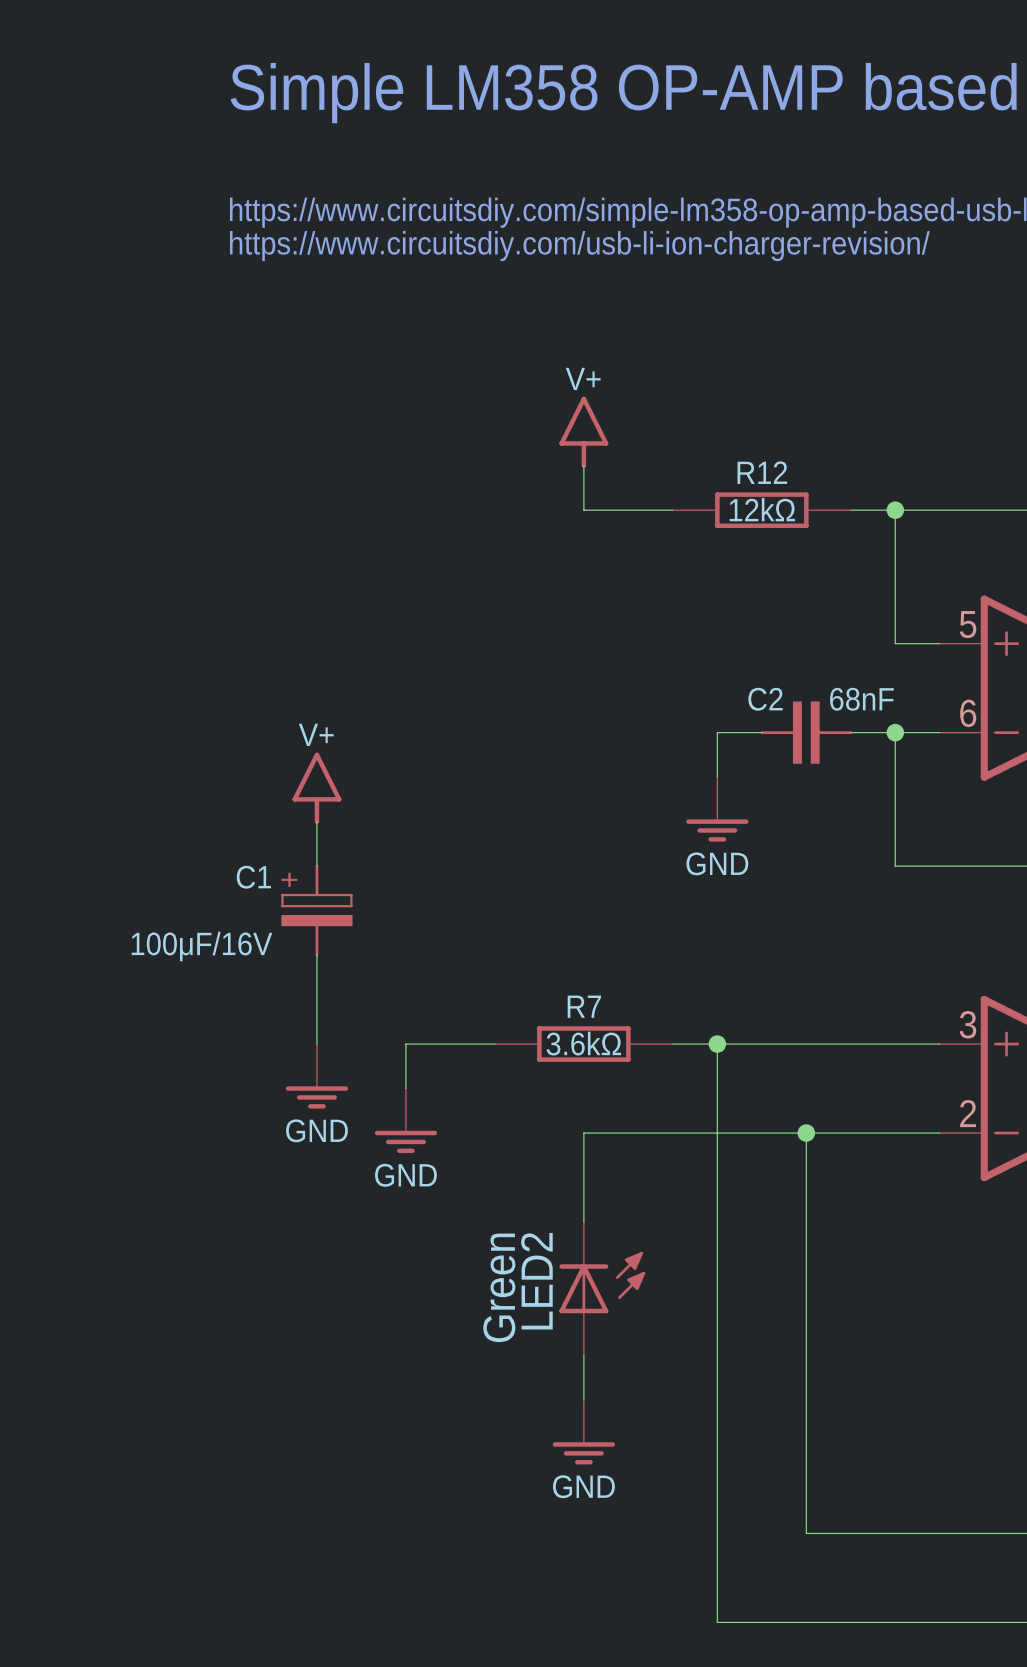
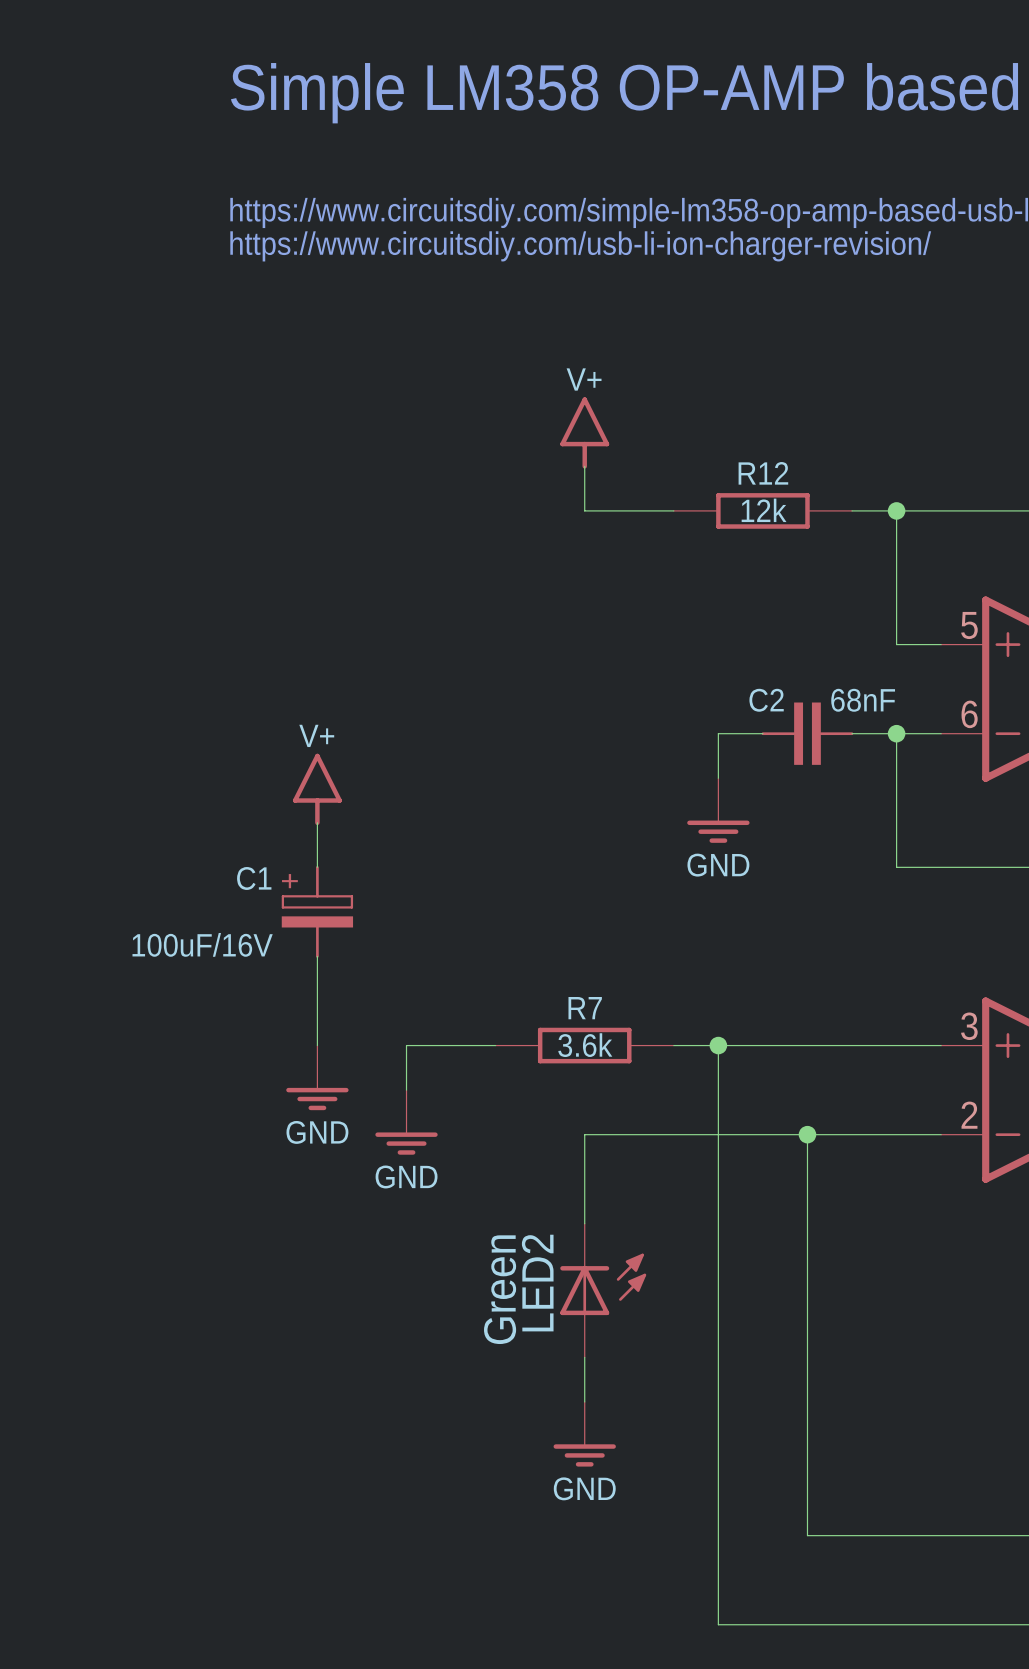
R12 value: 12kΩ (762, 509) -> 12k (764, 510)
C1 value: 100μF/16V (202, 946) -> 100uF/16V (202, 944)
R7 value: 3.6kΩ (583, 1043) -> 3.6k (585, 1045)

